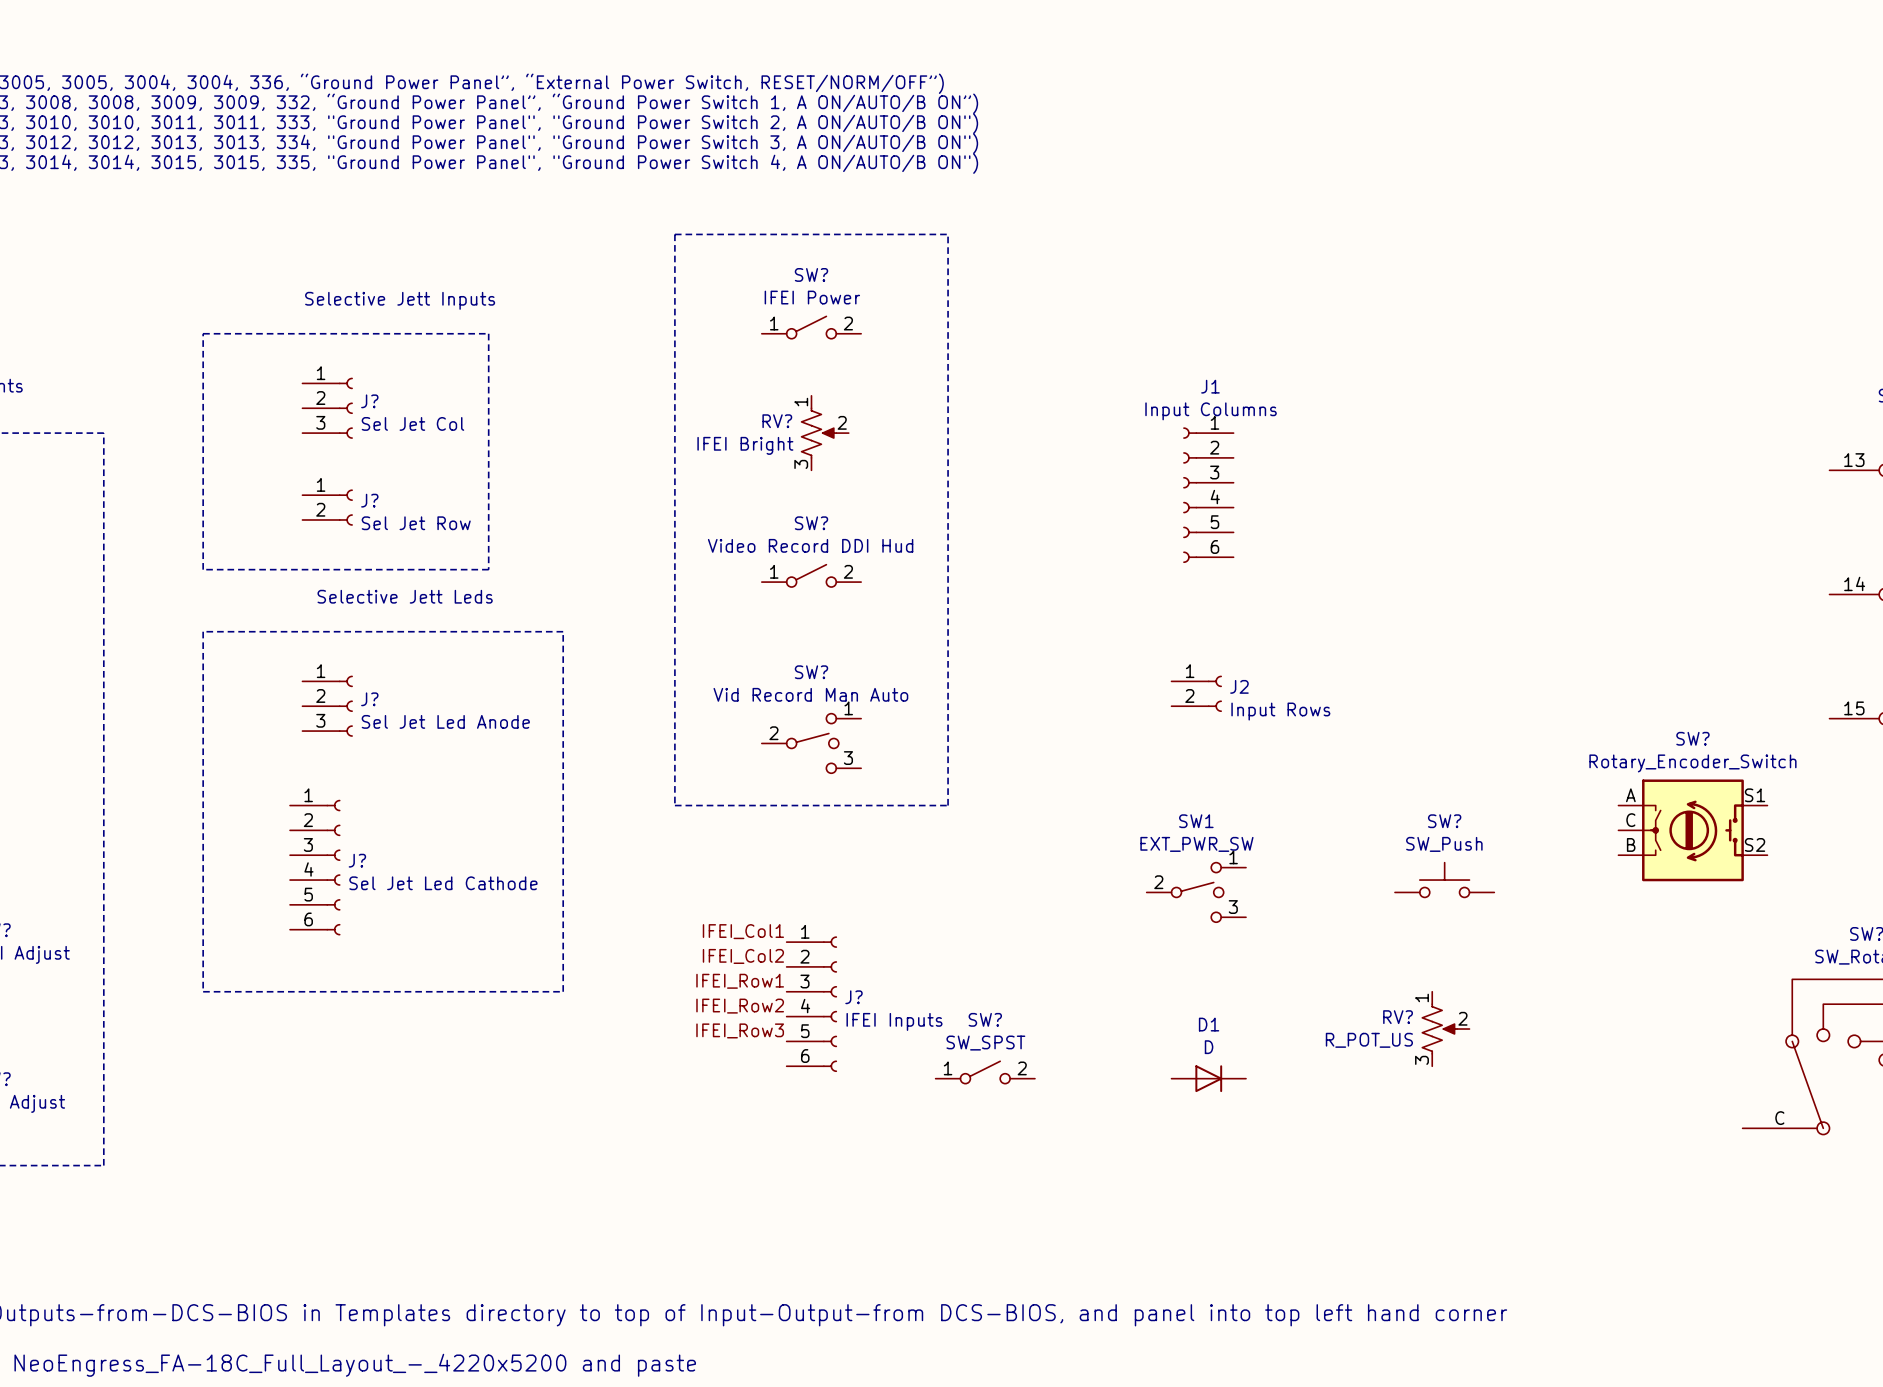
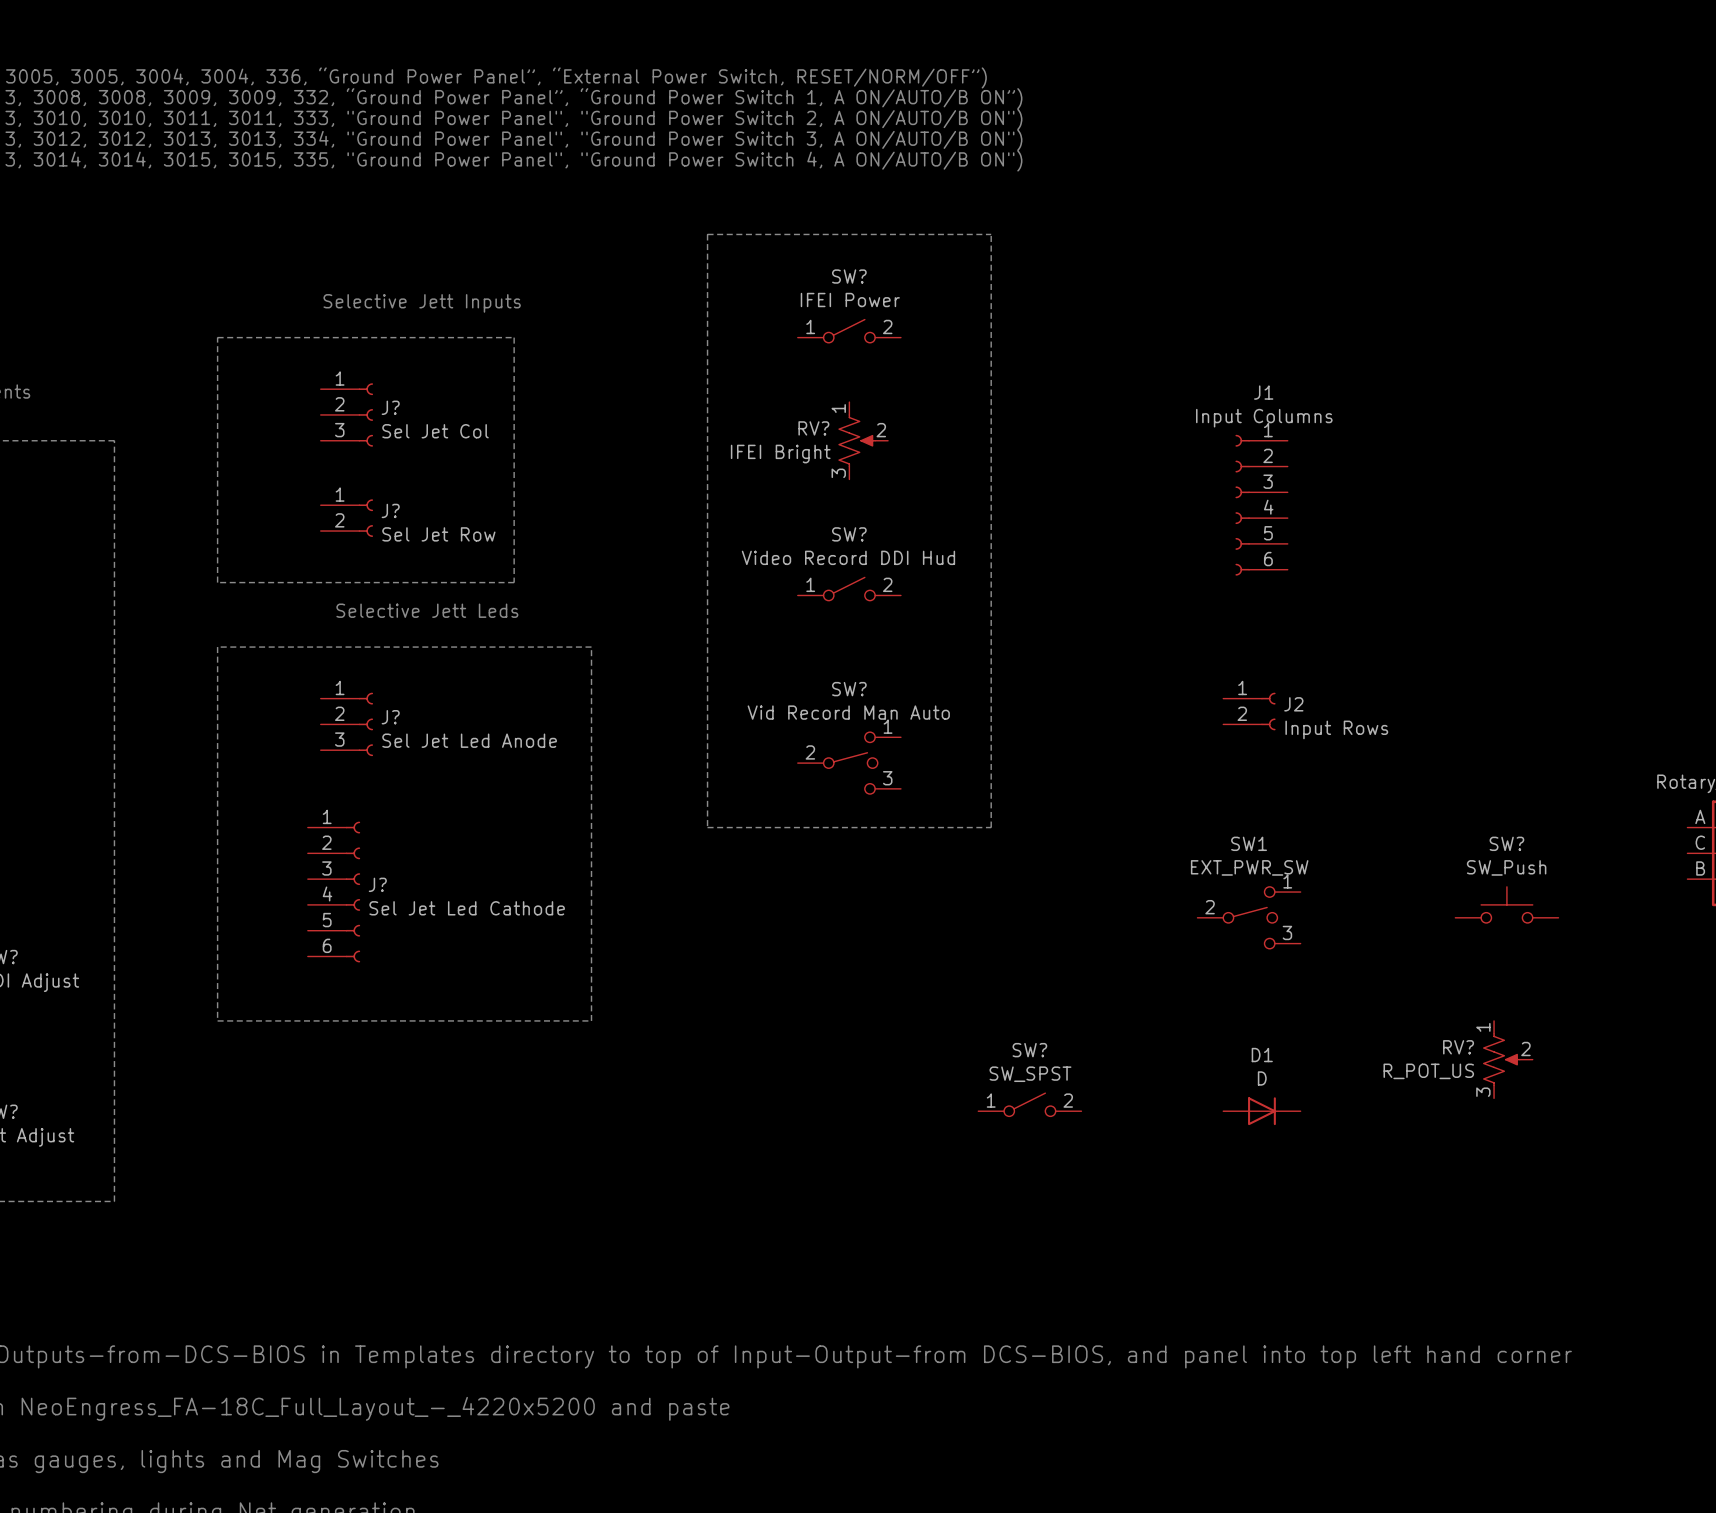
label: IFEI_Col1 (743, 931) -> none
label: IFEI_Col2 (743, 956) -> none
label: IFEI_Row1 (740, 981) -> none
J?: IFEI Inputs (811, 1004) -> none
label: IFEI_Row2 (740, 1006) -> none
label: IFEI_Row3 (740, 1030) -> none

